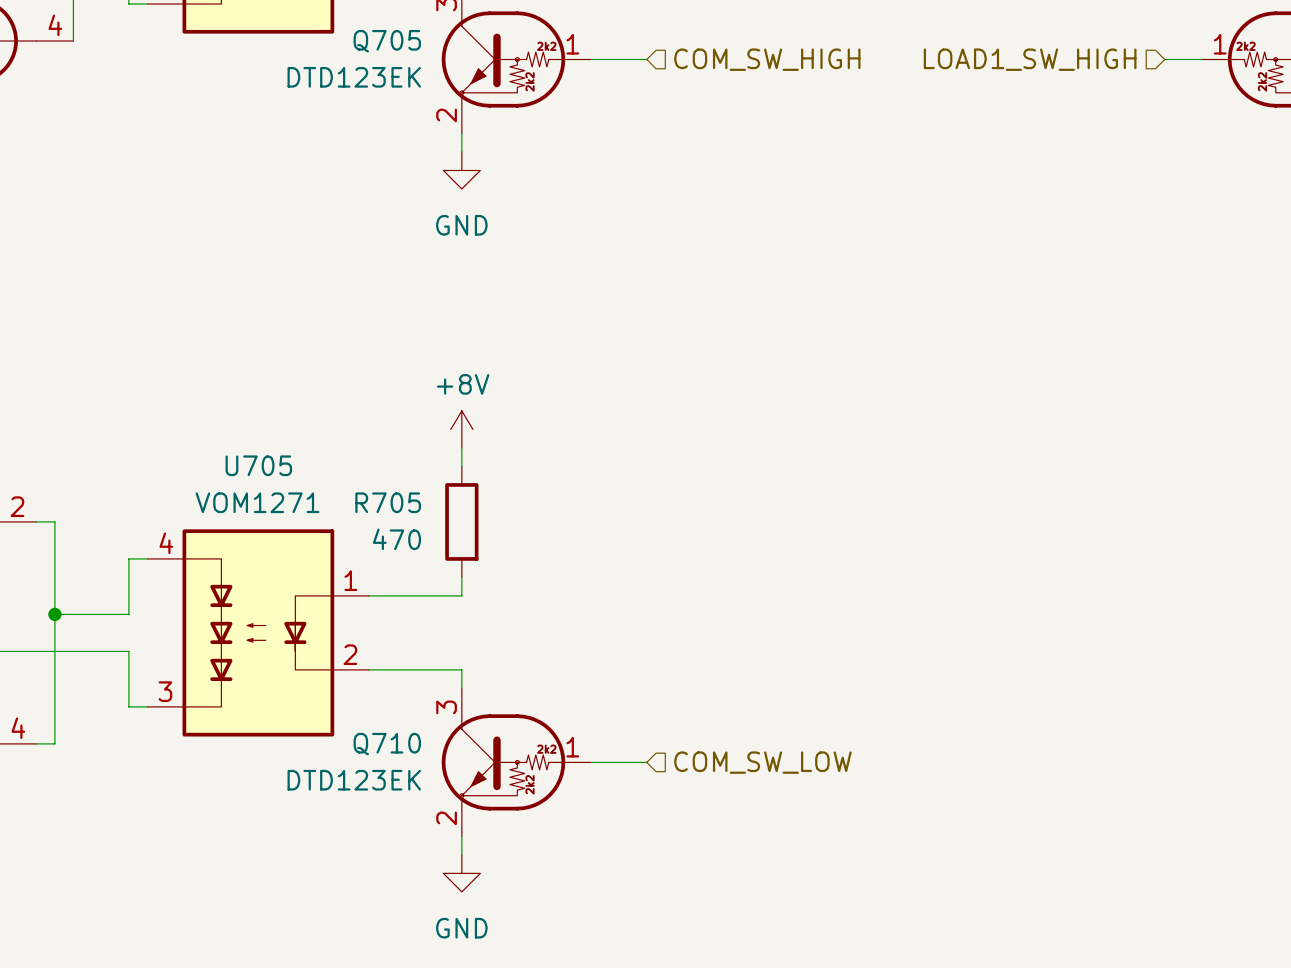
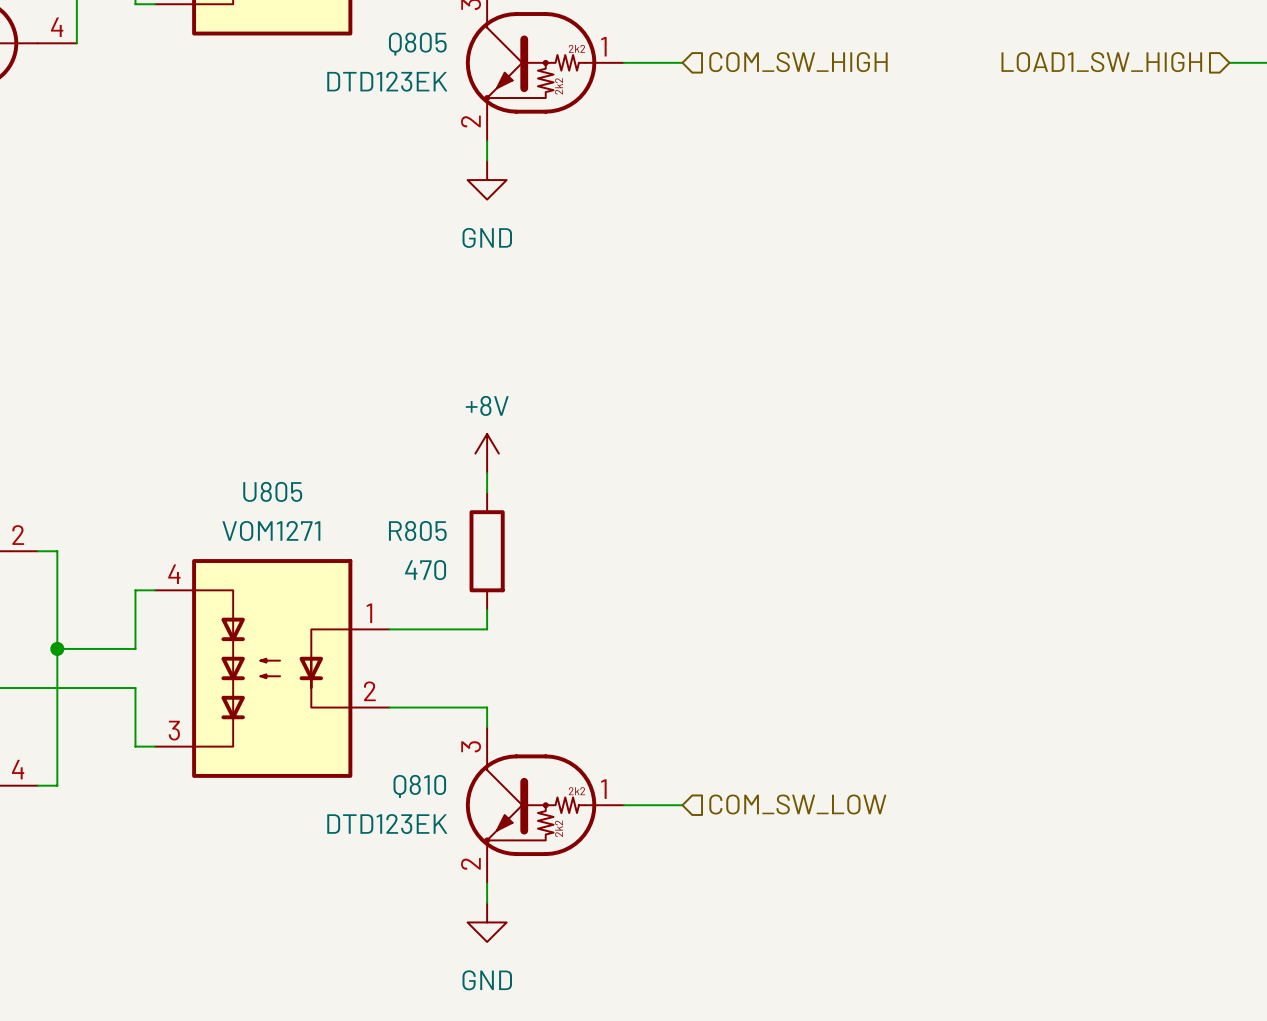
Q705 name: Q705 (387, 41) -> Q805 (417, 44)
U705 name: U705 (258, 465) -> U805 (272, 491)
R705 name: R705 (388, 502) -> R805 (417, 530)
Q710 name: Q710 (387, 744) -> Q810 (419, 786)

